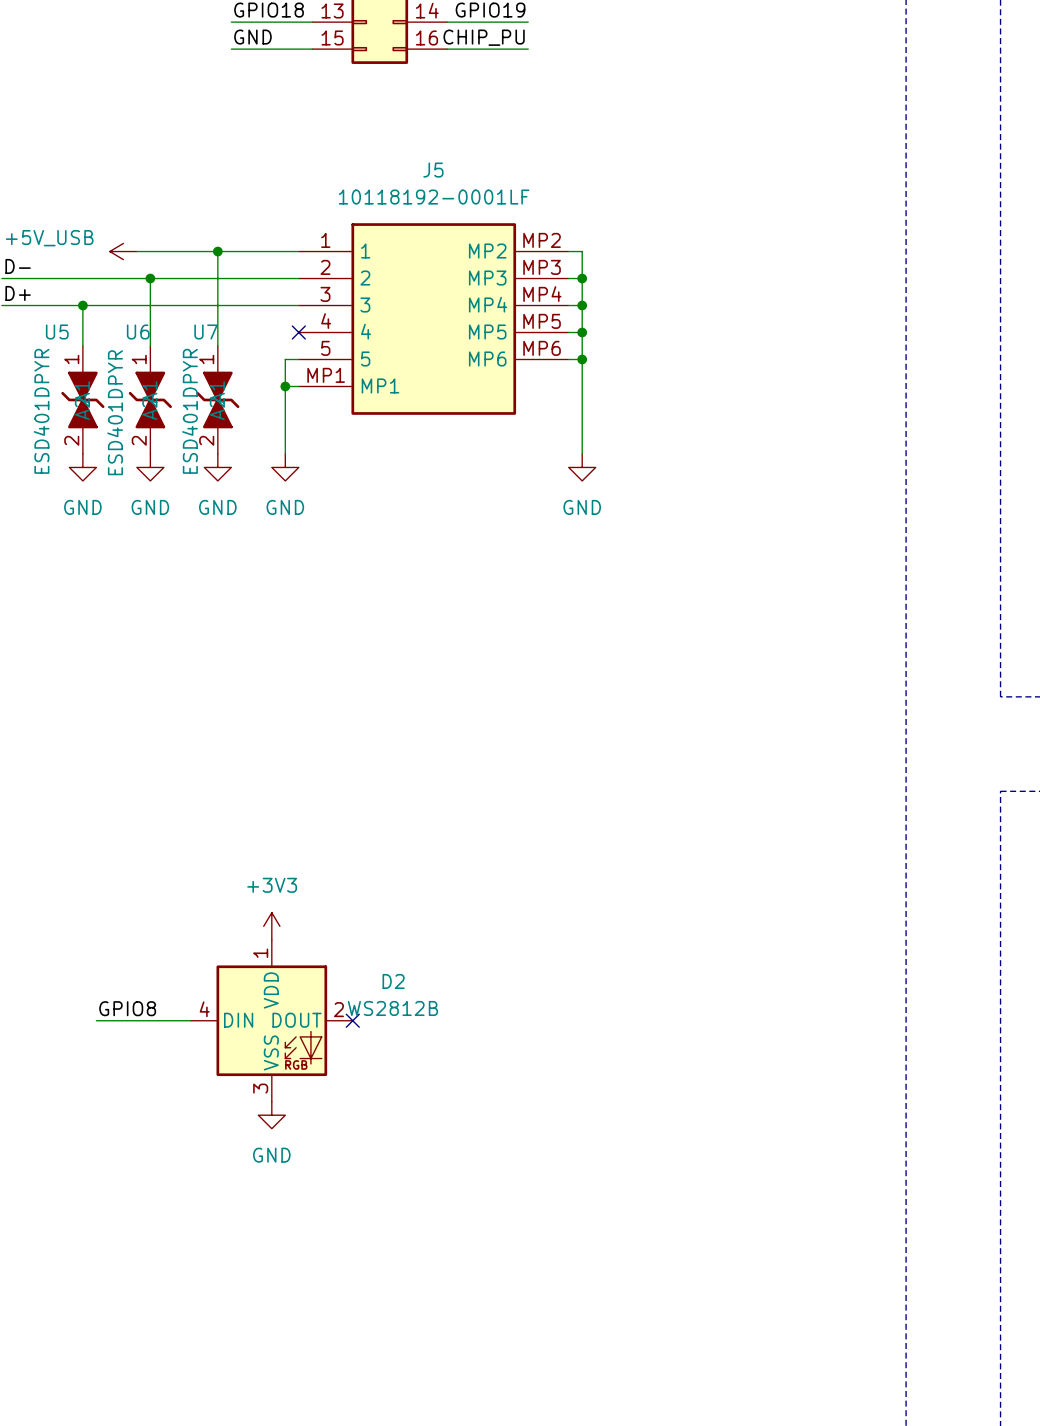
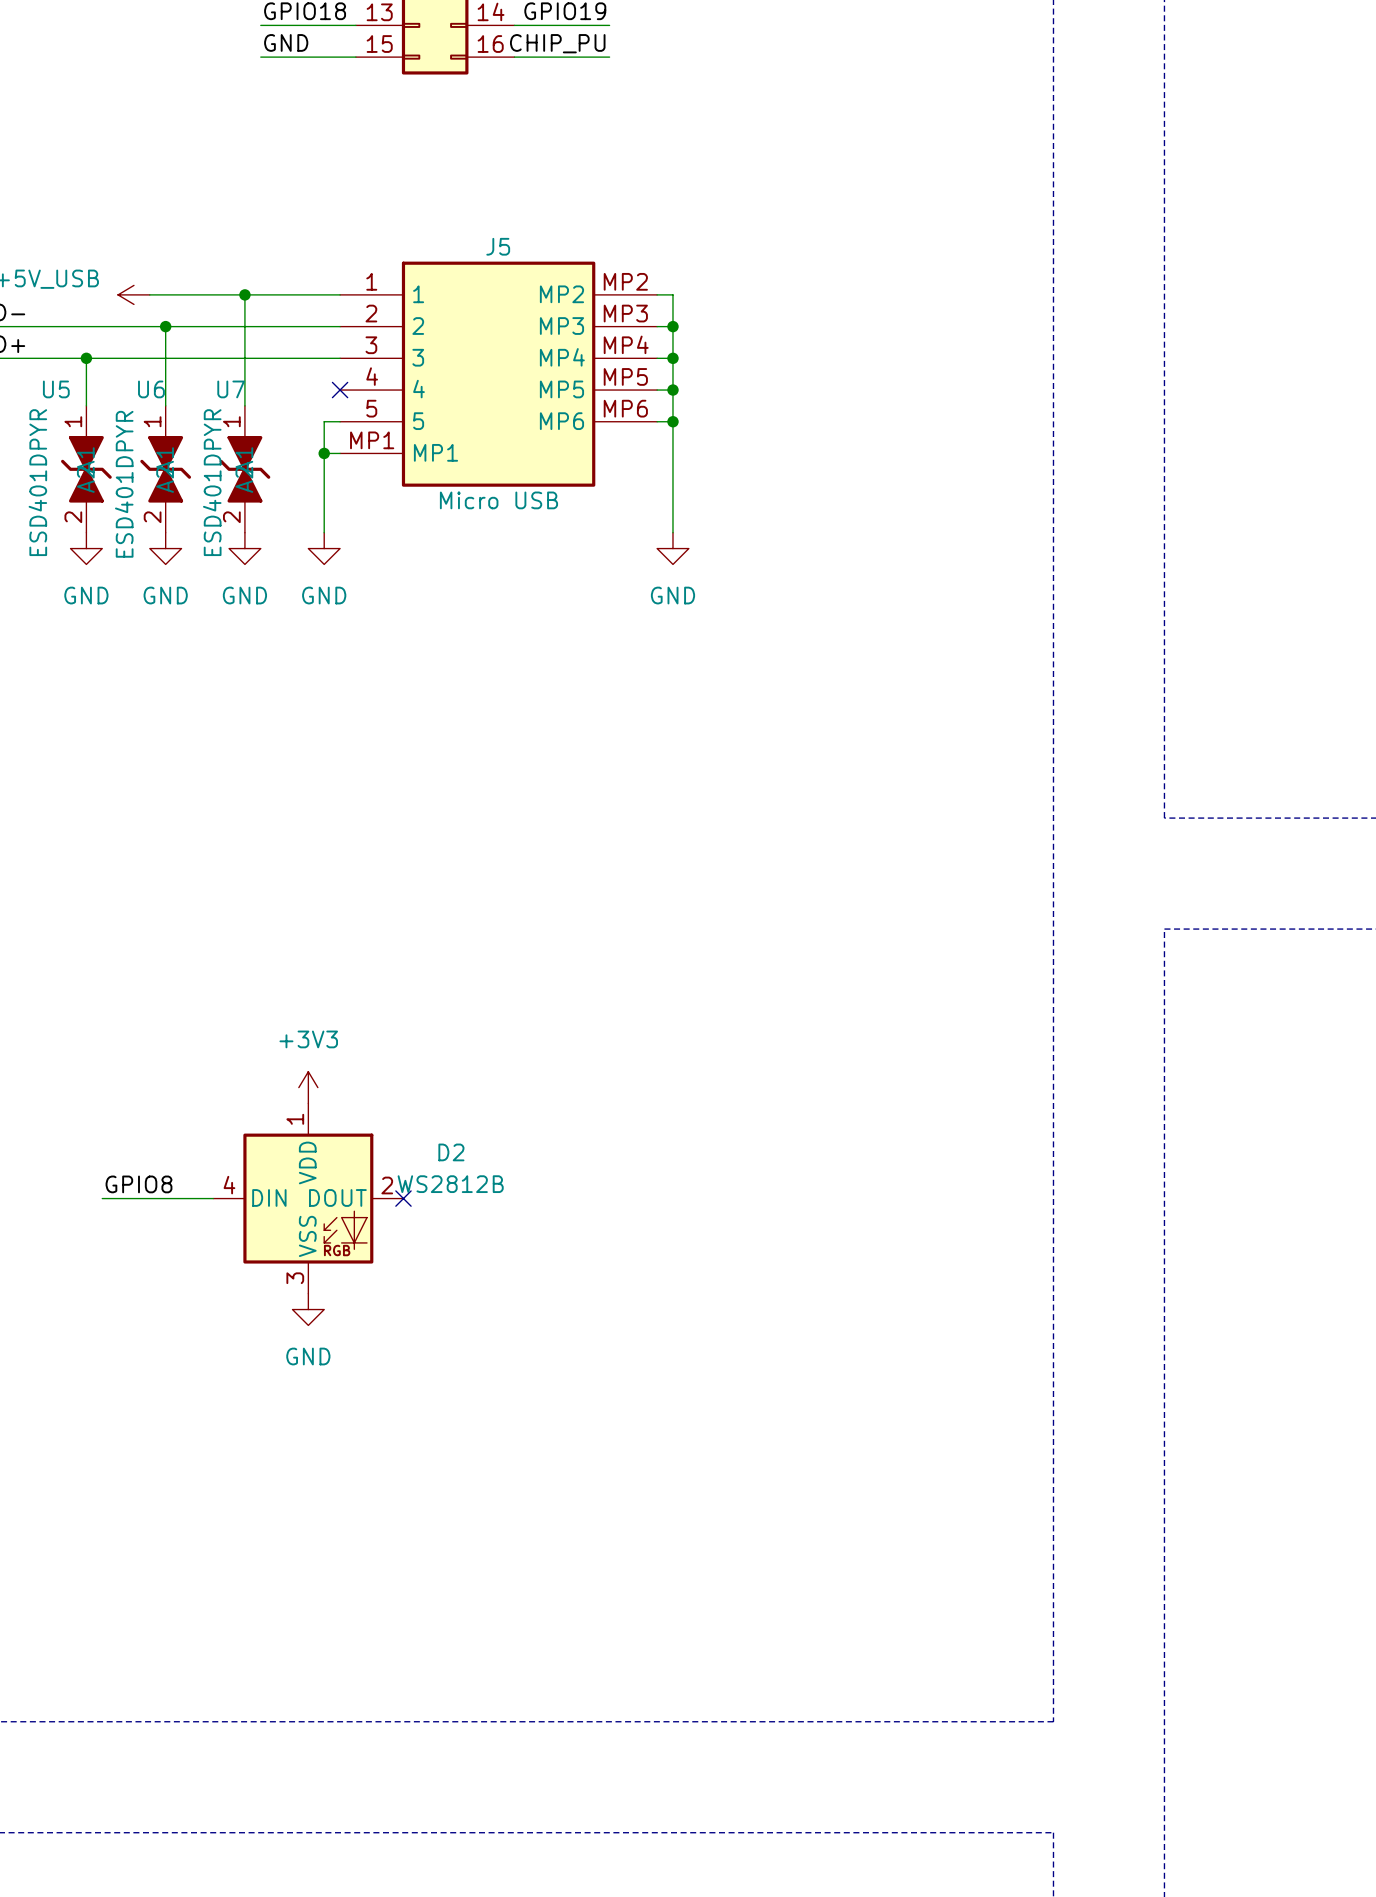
J5 name position: J5 (433, 170) -> J5 (498, 246)
J5 value: 10118192-0001LF (434, 197) -> none
J5 text: none -> Micro USB (498, 500)

